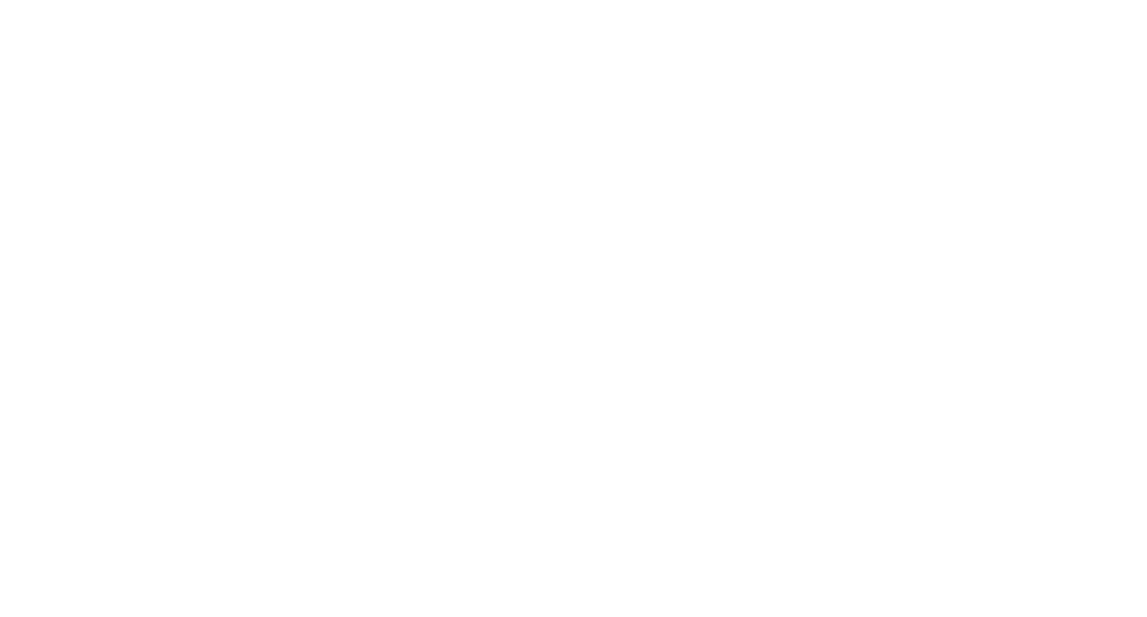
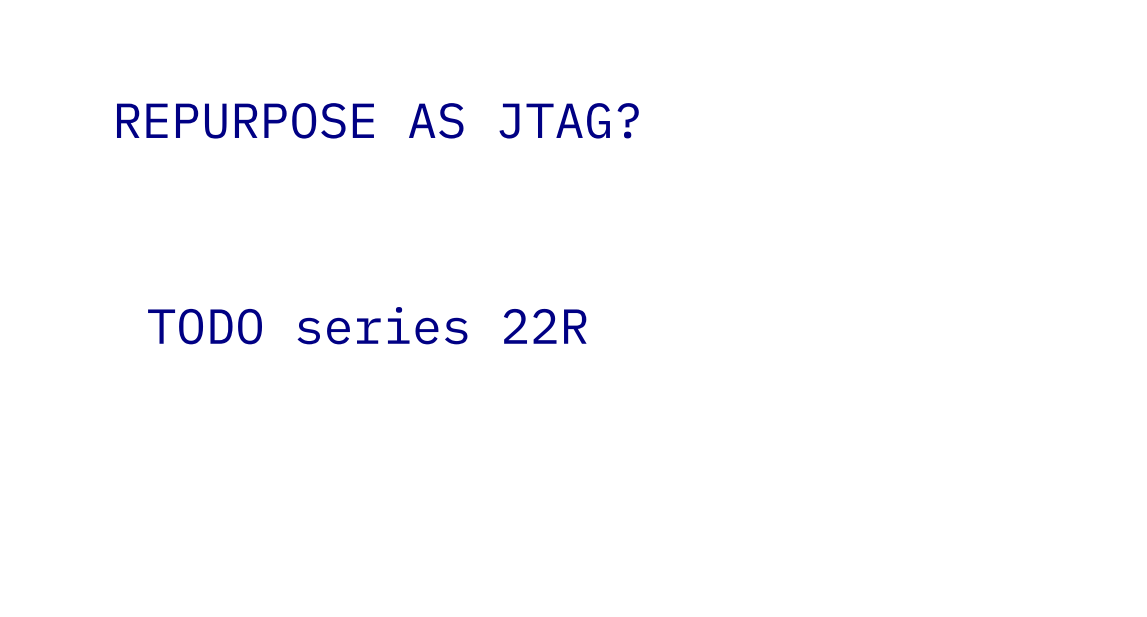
text: none -> REPURPOSE AS JTAG? (377, 120)
text: none -> TODO series 22R (367, 325)

